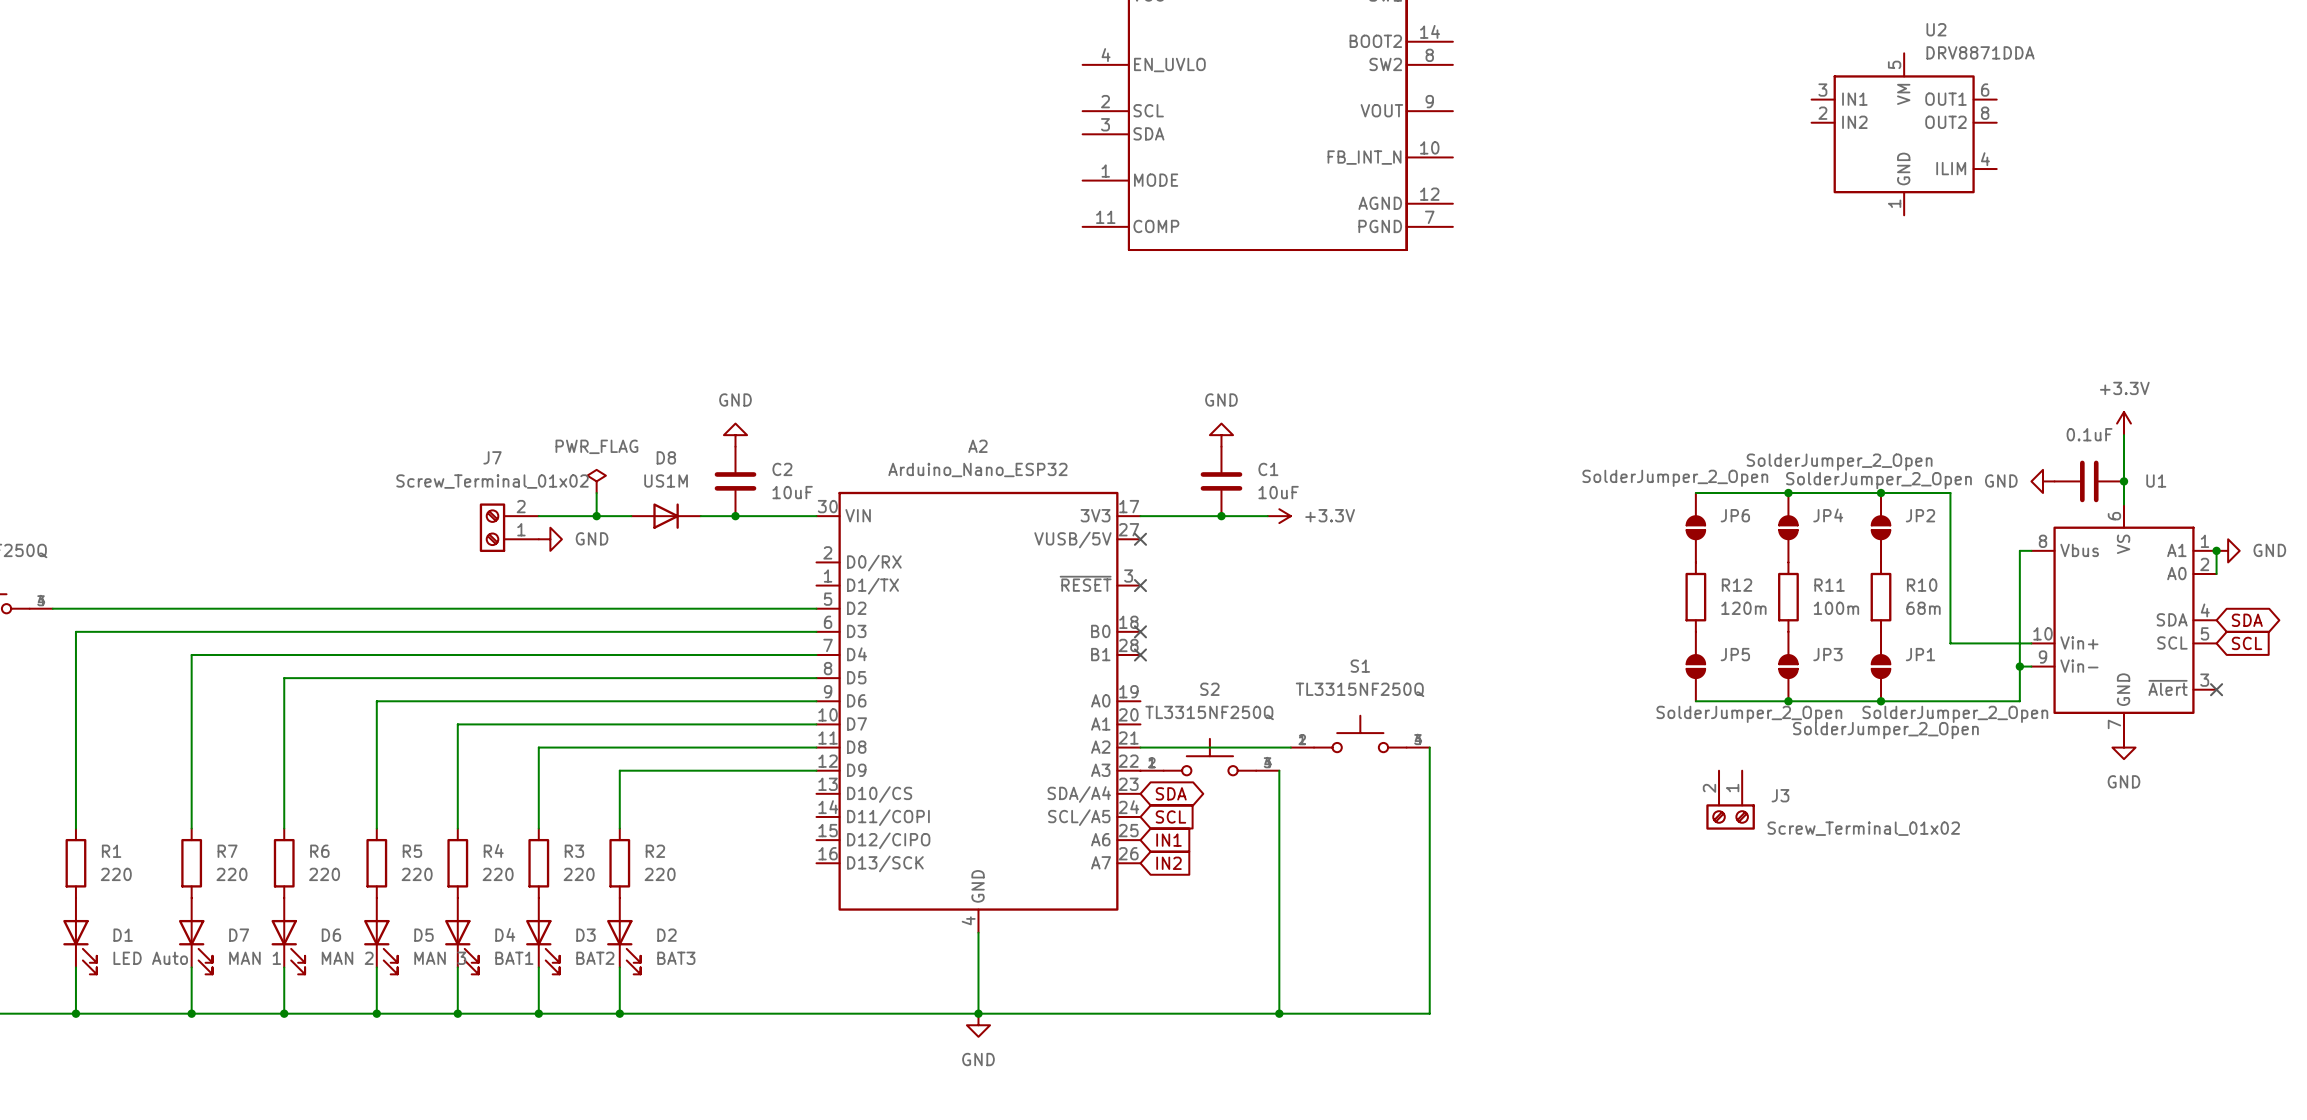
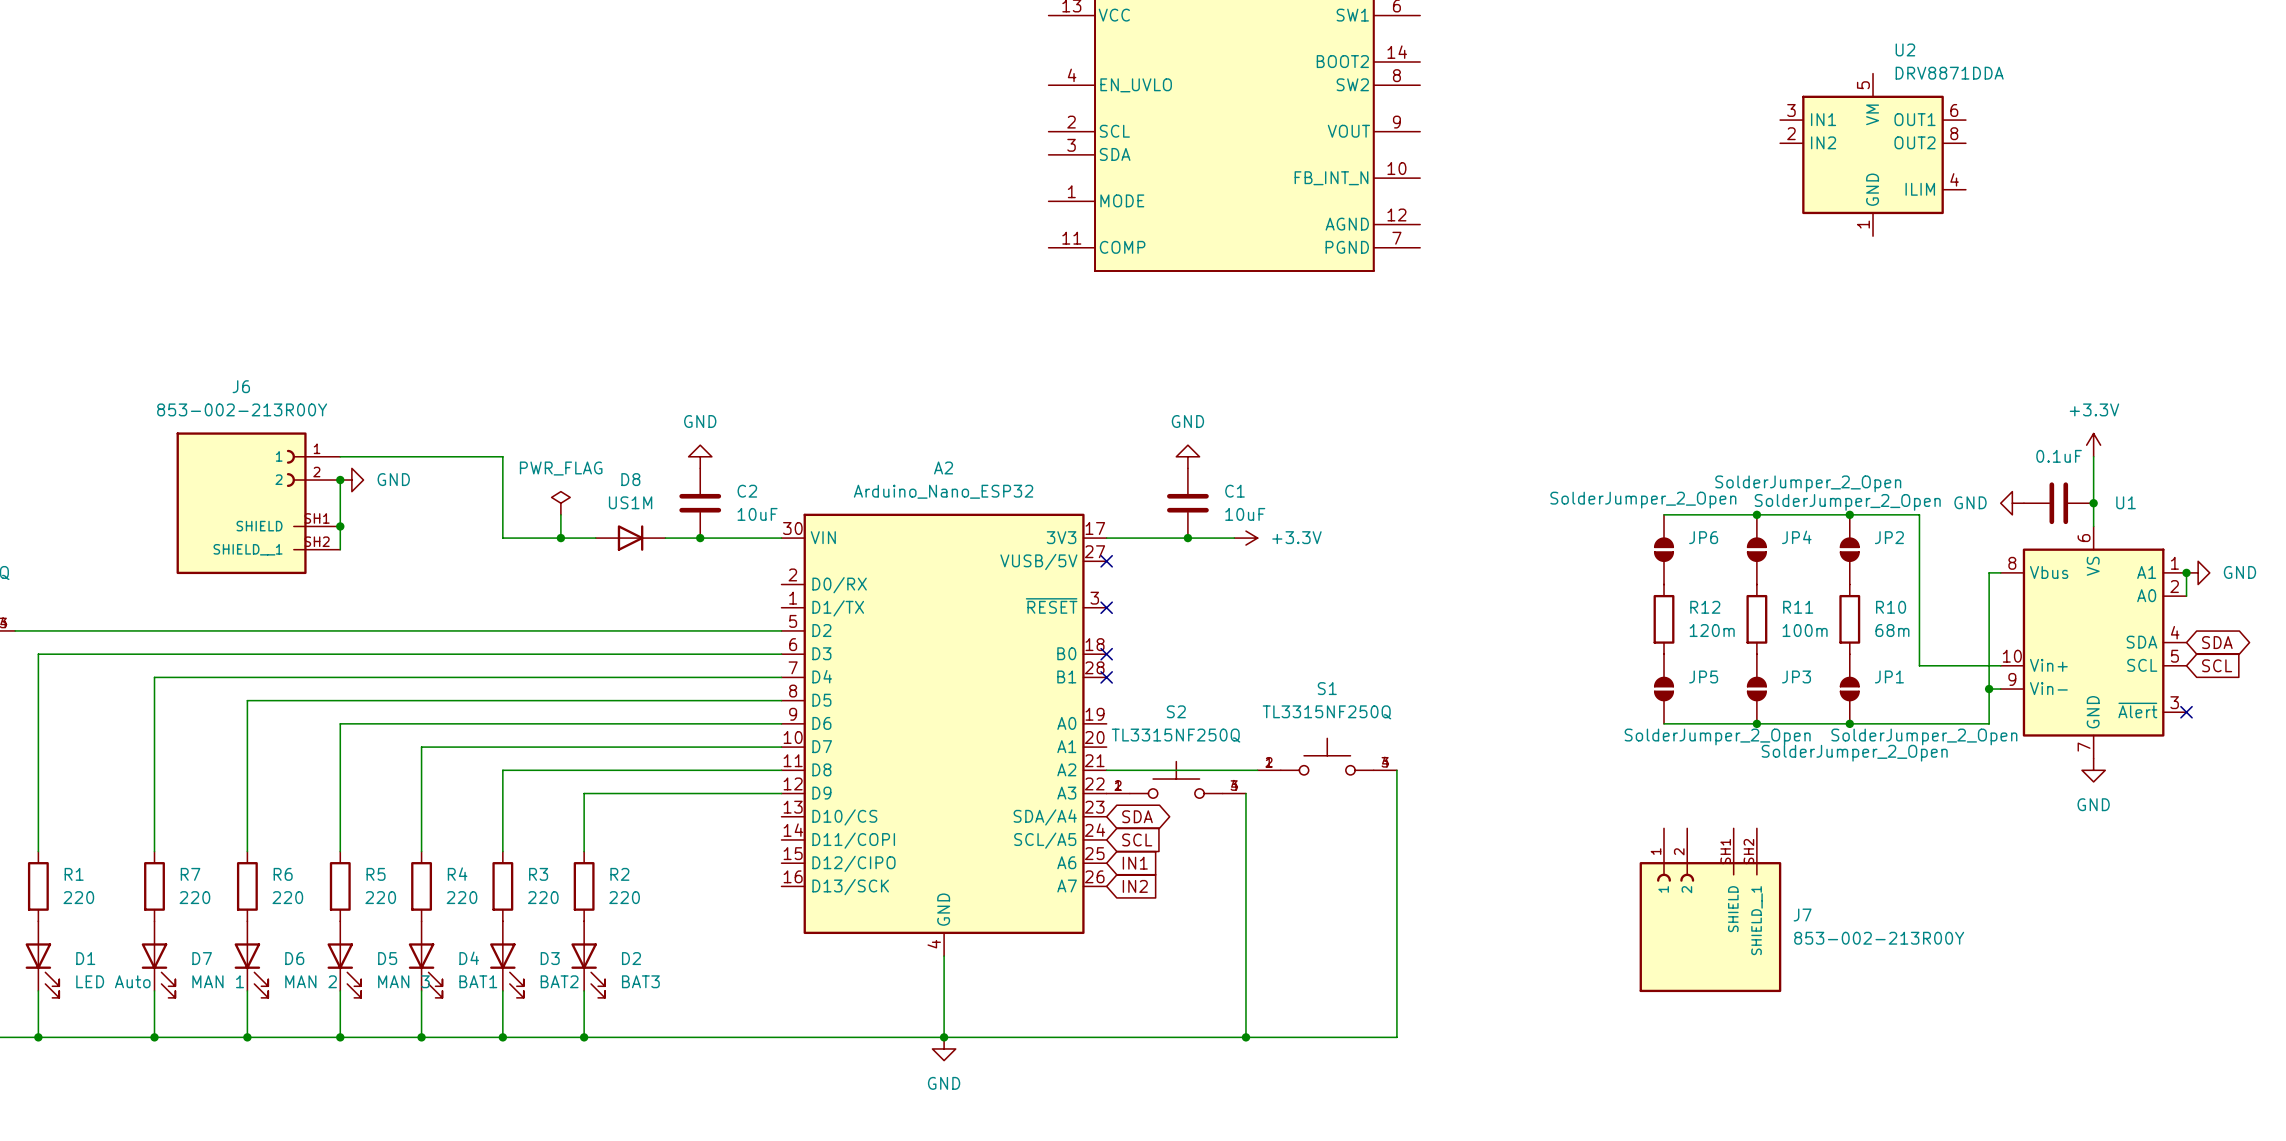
wire: none -> (340, 456) (502, 456) (502, 538)
J7 name position: J7 (492, 457) -> J7 (1802, 915)
wire: none -> (340, 480) (340, 549)
junction: none -> (340, 480)
J6: none -> 853-002-213R00Y (258, 503)
J7 value: Screw_Terminal_01x02 (492, 481) -> 853-002-213R00Y (1879, 938)
J7 symbol: [479, 503, 539, 553] -> [1639, 828, 1782, 993]
junction: none -> (340, 526)
power symbol position: GND (550, 539) -> GND (351, 480)
J3: Screw_Terminal_01x02 (1730, 800) -> none

